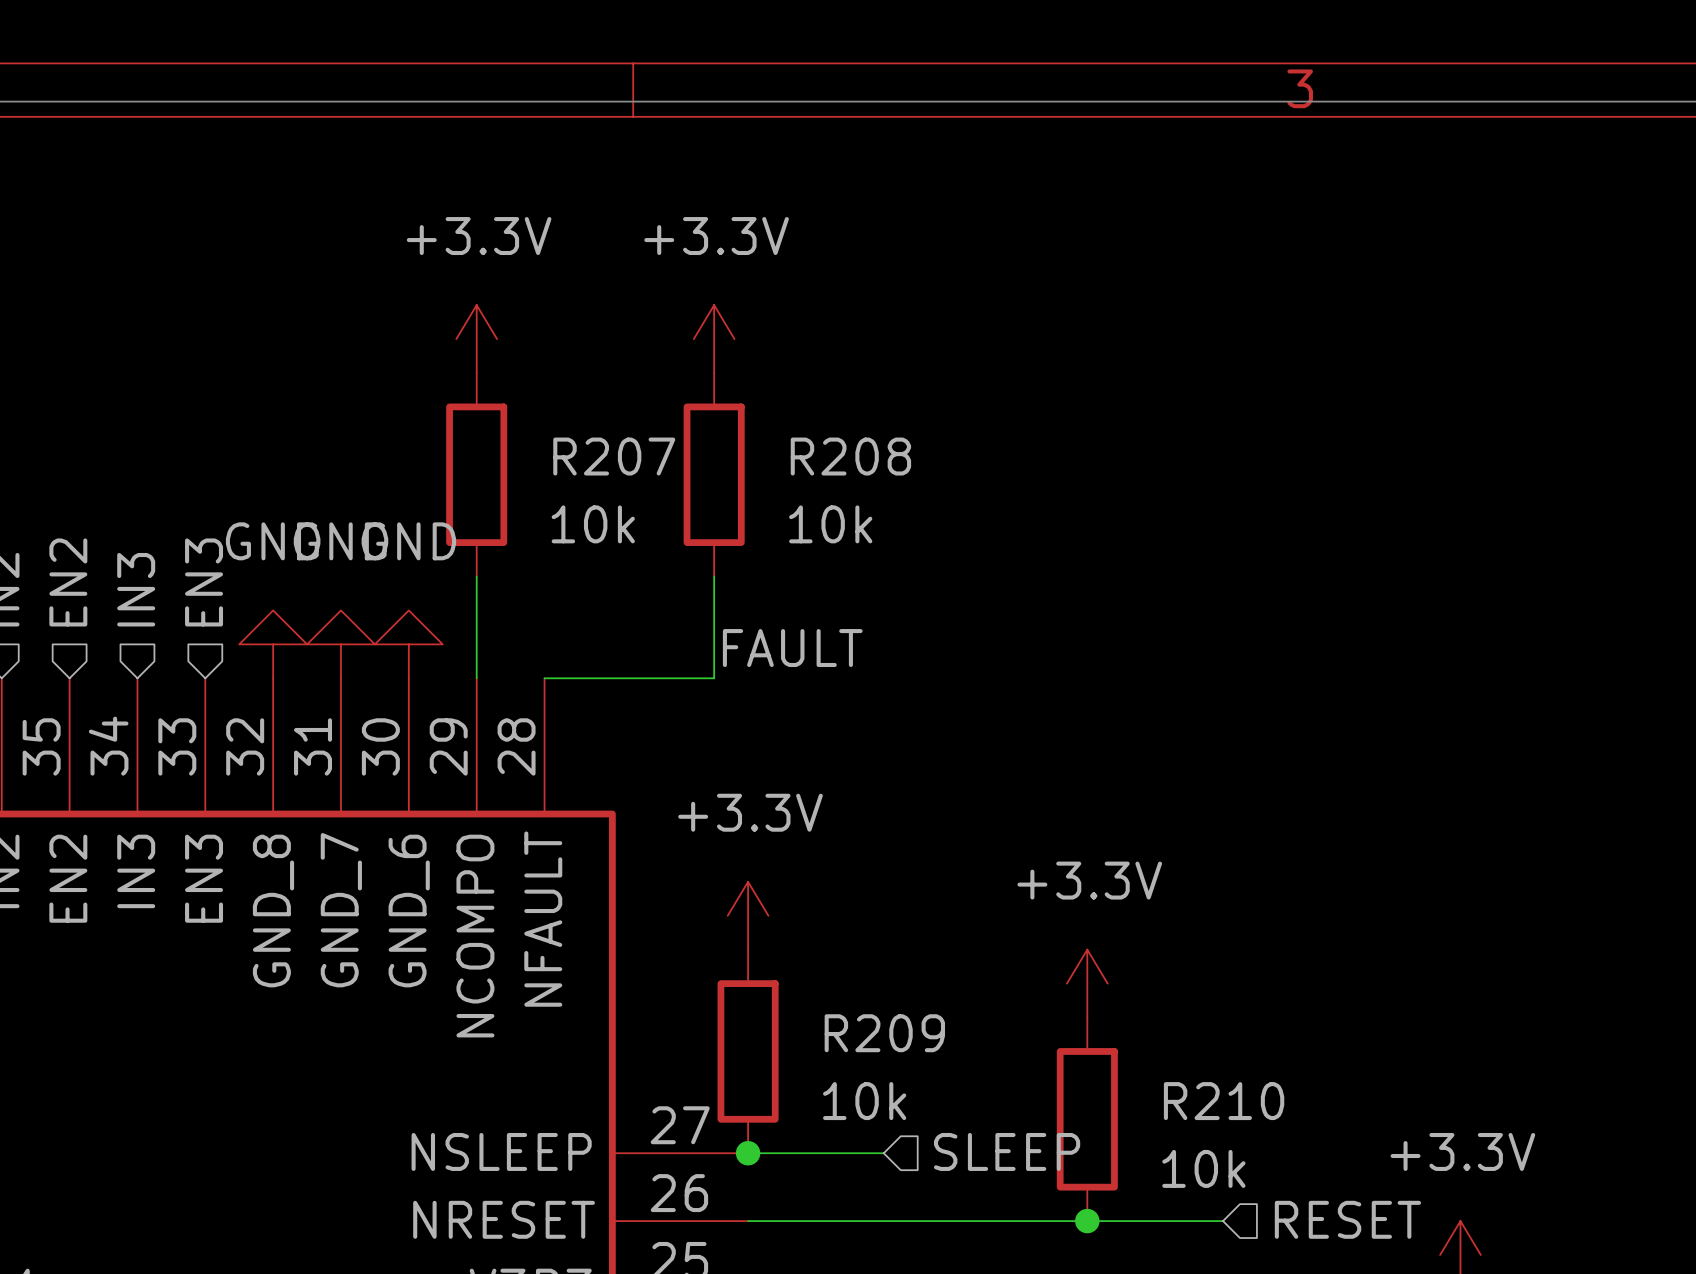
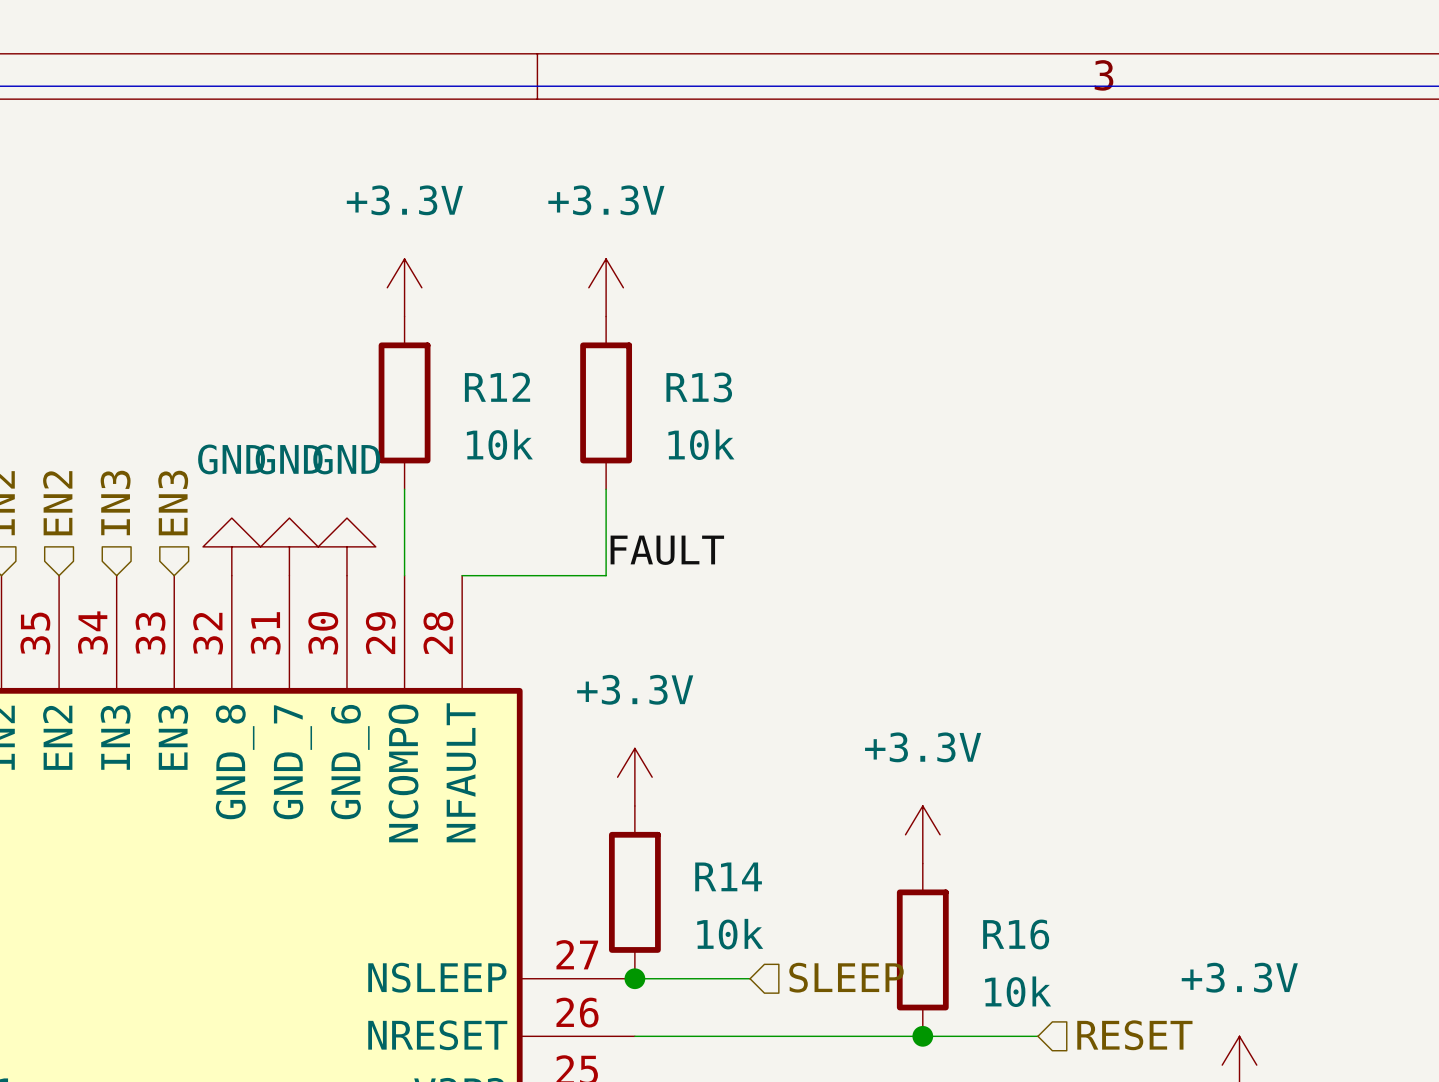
R207 name: R207 (614, 456) -> R12 (497, 387)
R208 name: R208 (850, 456) -> R13 (699, 387)
R209 name: R209 (884, 1033) -> R14 (728, 876)
R210 name: R210 (1224, 1101) -> R16 (1016, 934)

